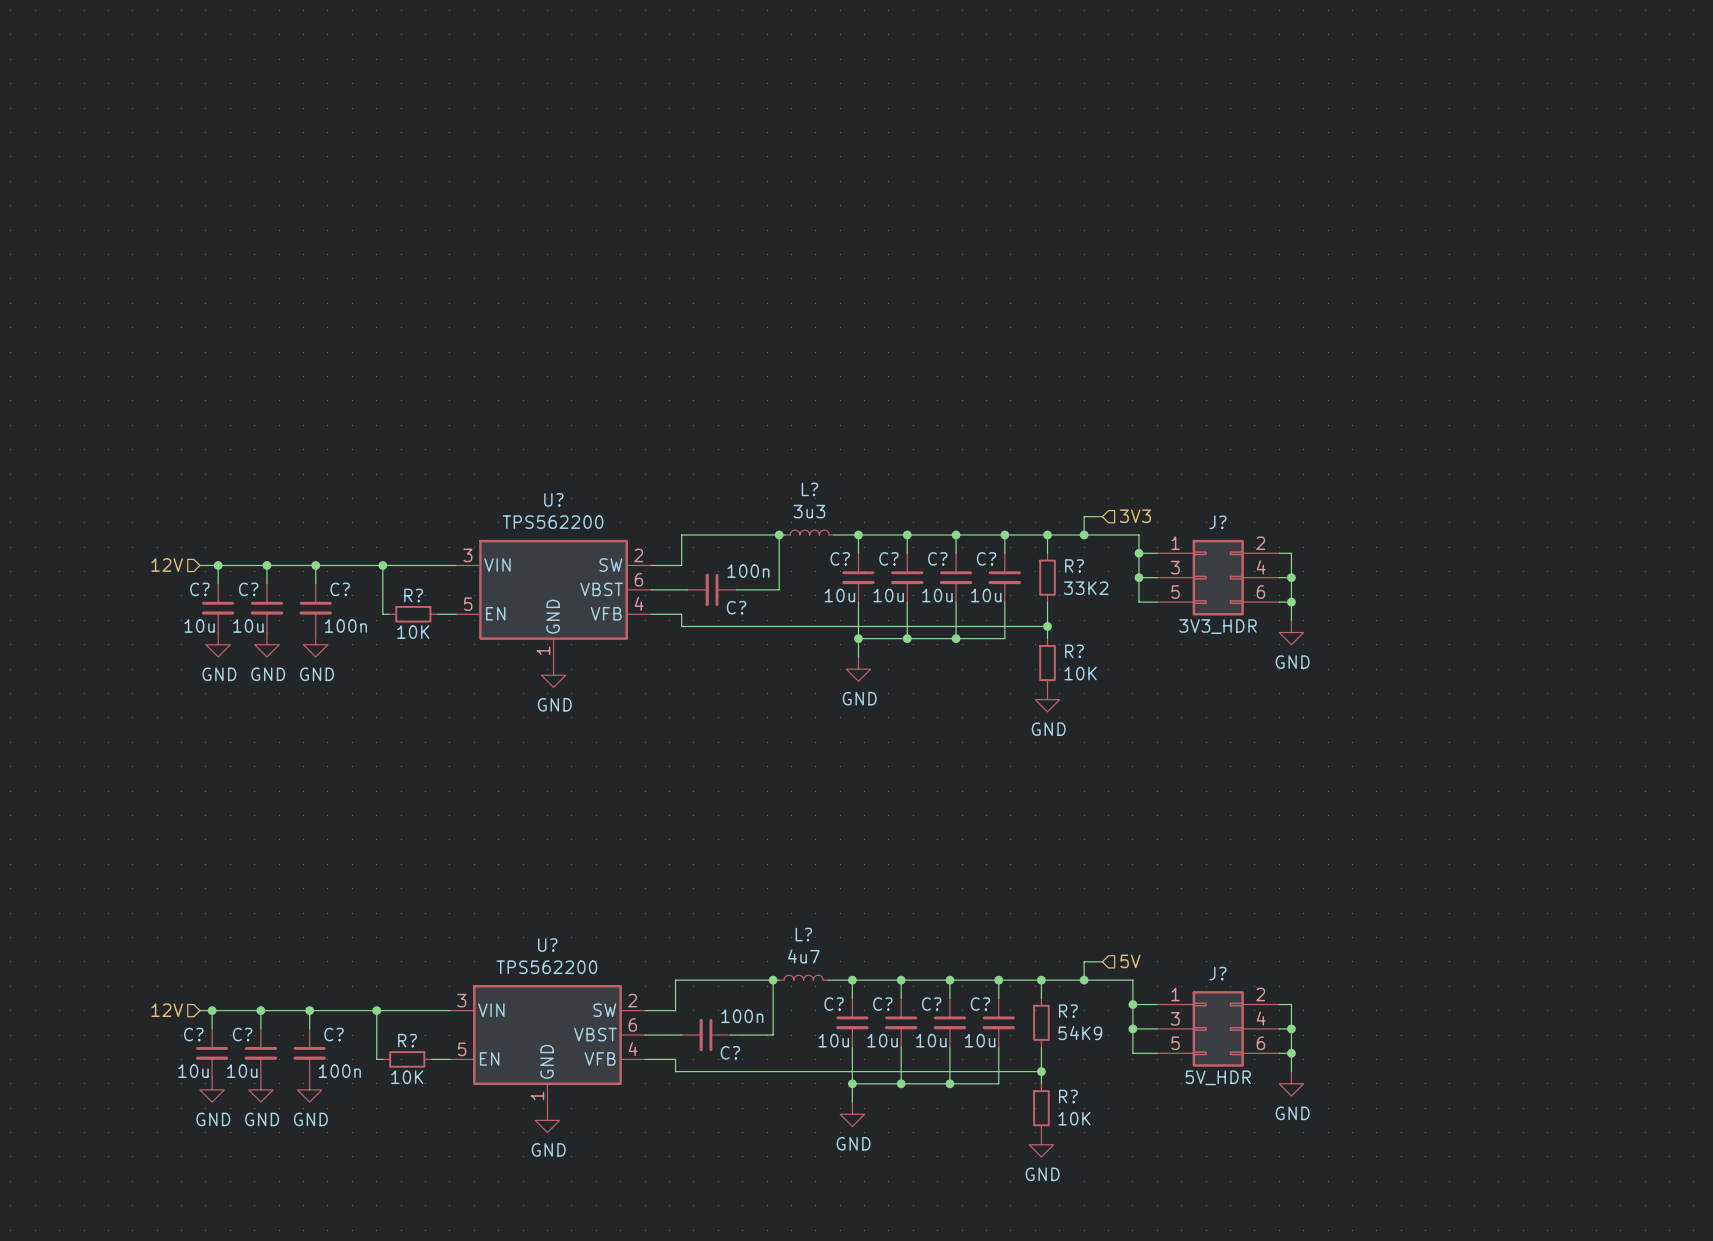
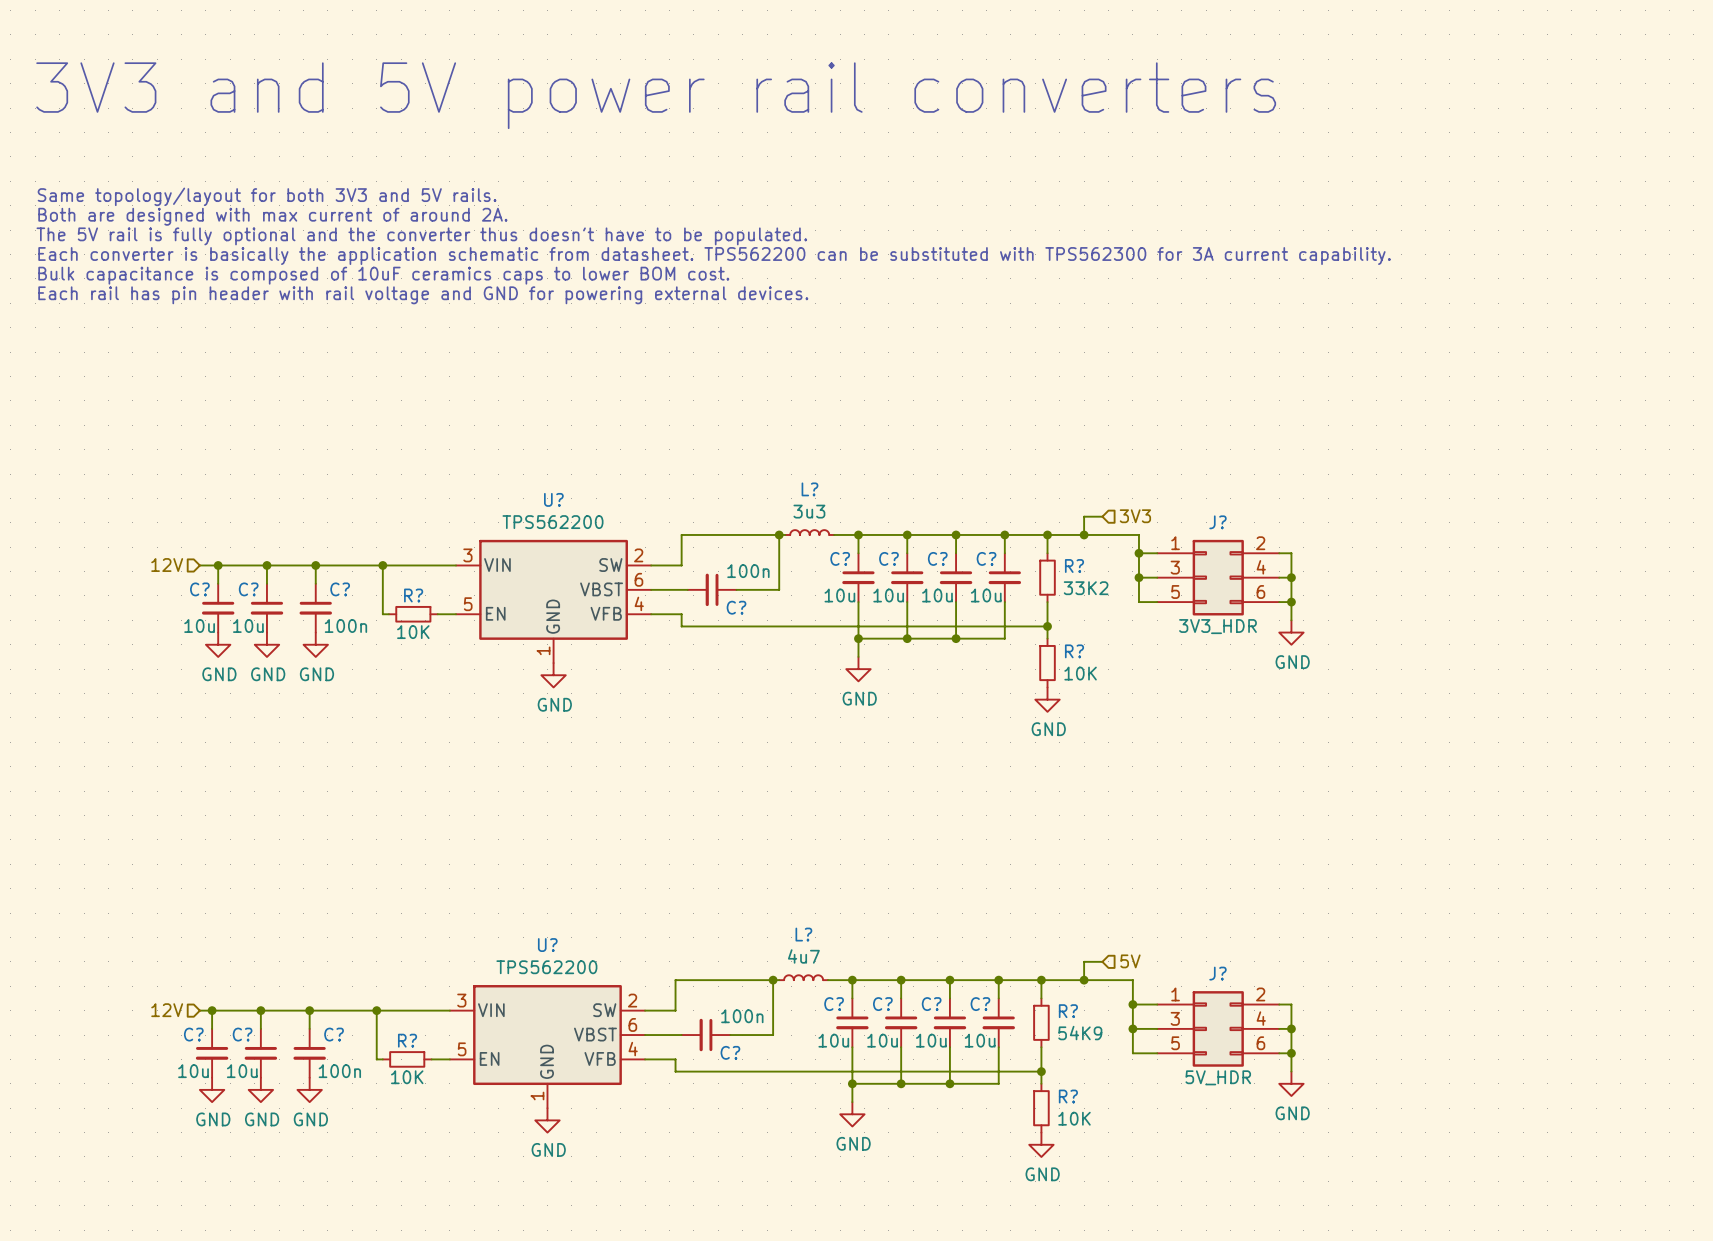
text: none -> 3V3 and 5V power rail converters (656, 95)
text: none -> Same topology/layout for both 3V3 and 5V rails. (267, 196)
text: none -> Both are designed with max current of around 2A. (272, 216)
text: none -> The 5V rail is fully optional and the converter thus doesn't have to be populated. (421, 236)
text: none -> Each converter is basically the application schematic from datasheet. TPS562200 can be substituted with TPS562300 for 3A current capability. (714, 256)
text: none -> Bulk capacitance is composed of 10uF ceramics caps to lower BOM cost. (383, 275)
text: none -> Each rail has pin header with rail voltage and GND for powering external devices. (423, 295)

